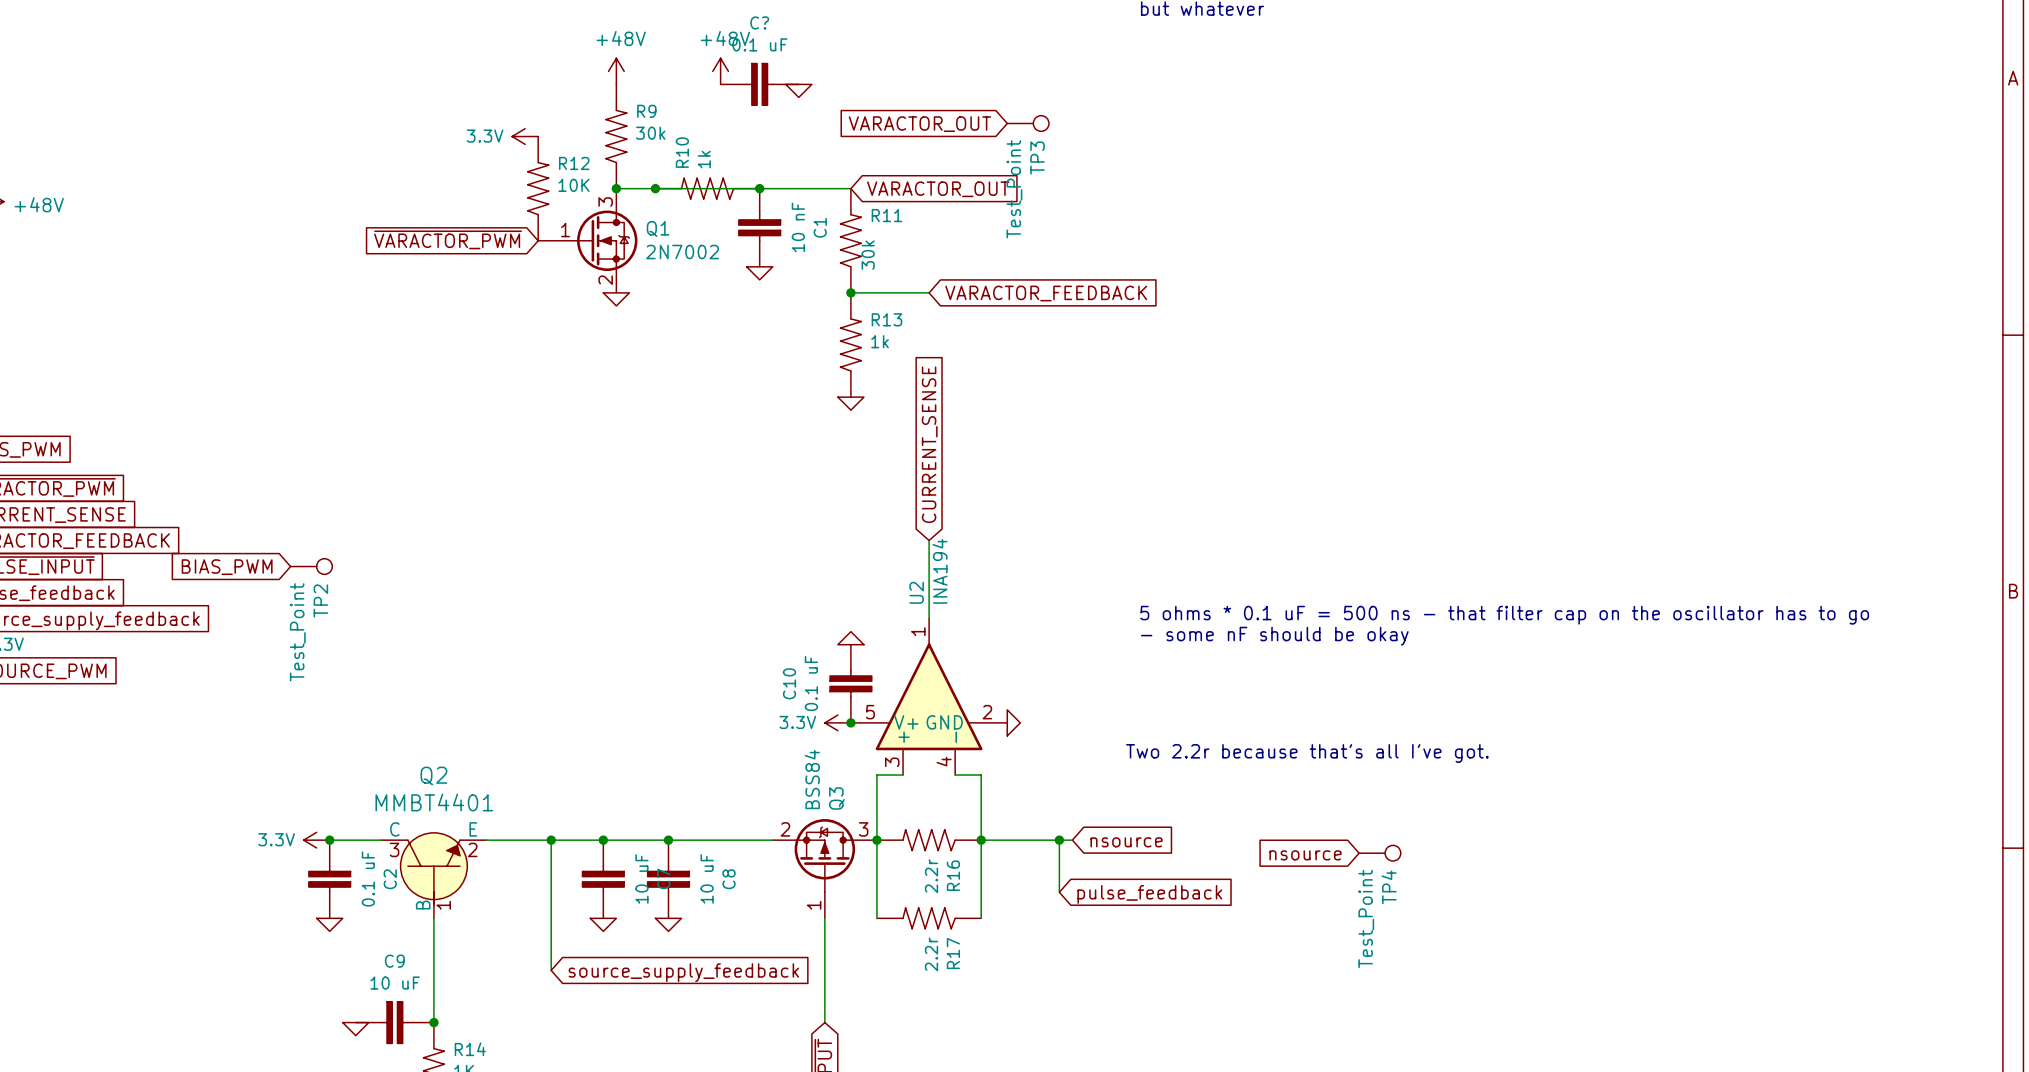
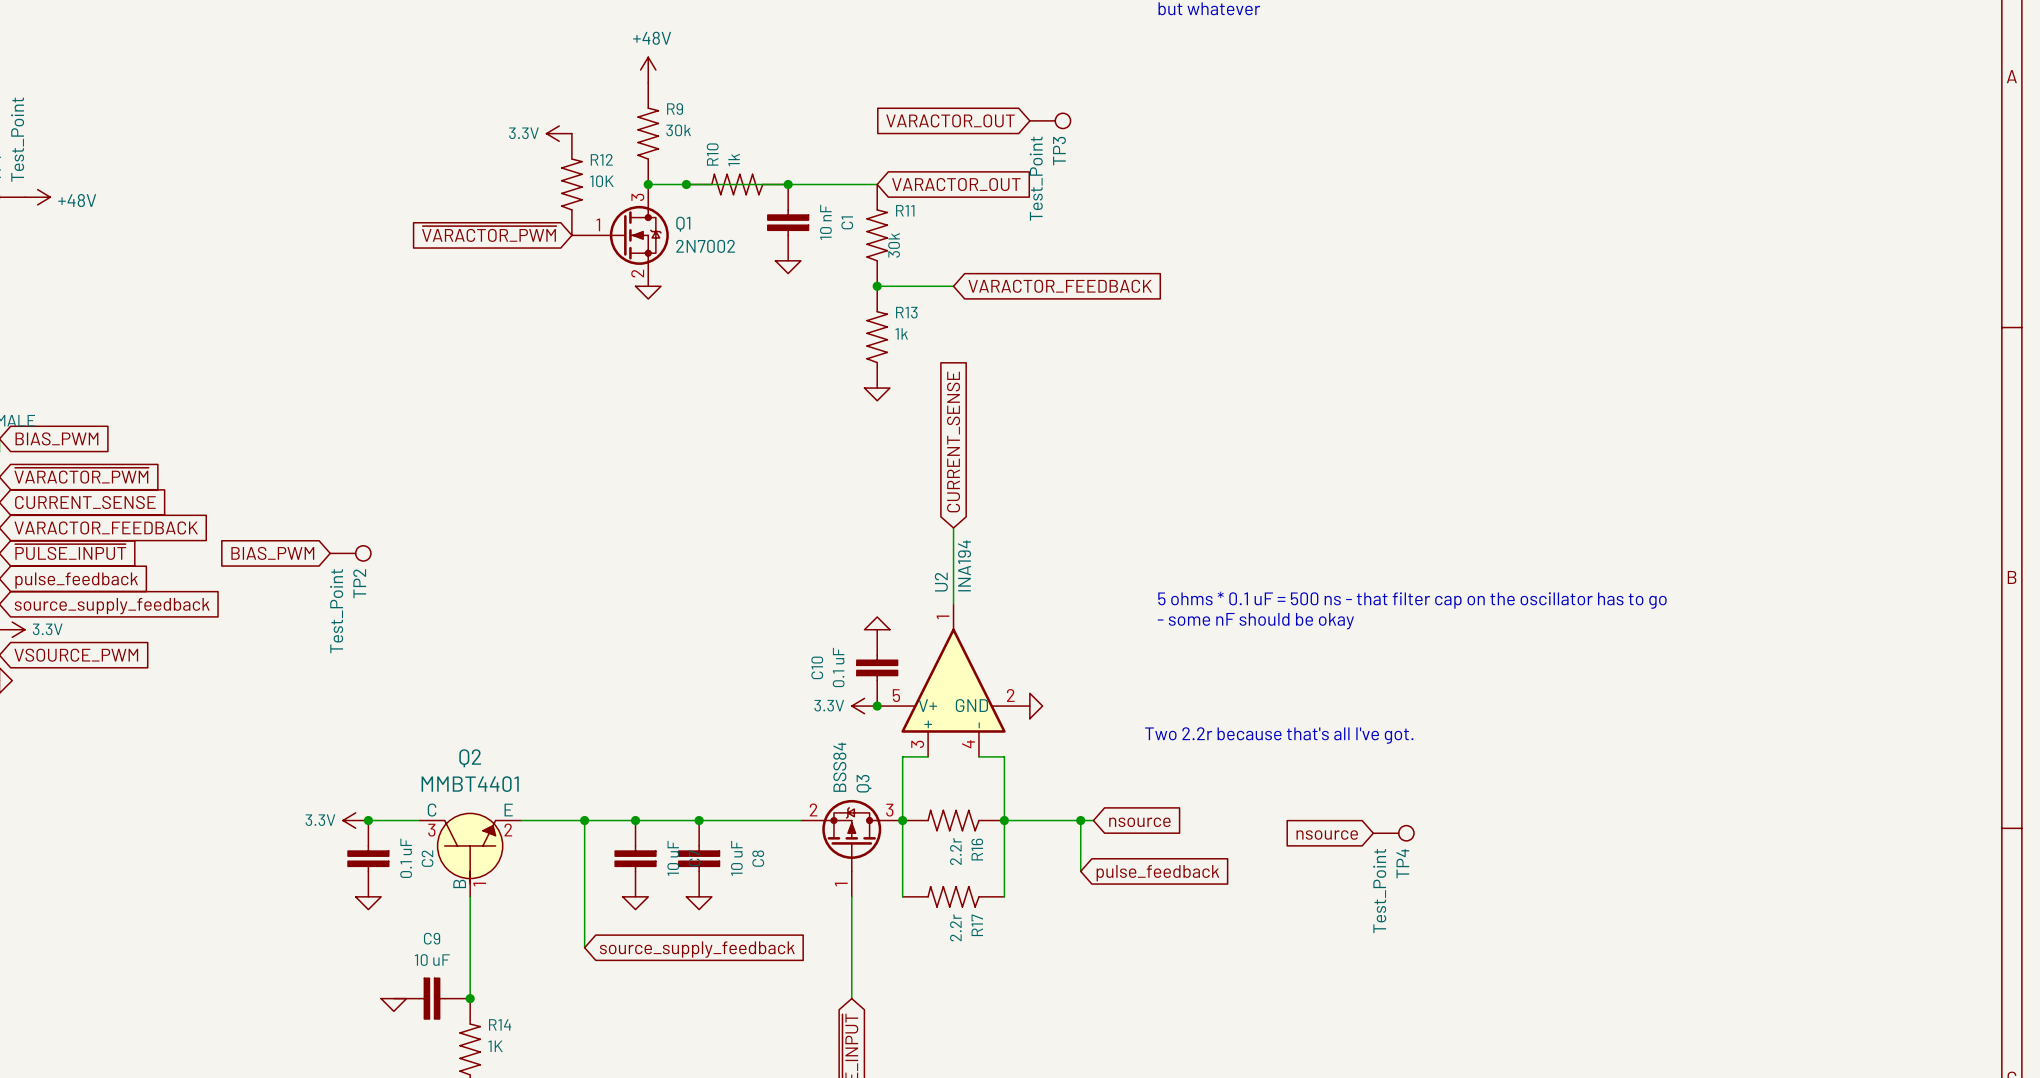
power symbol: +48V (720, 71) -> none
C?: 0.1 uF (759, 84) -> none
power symbol: (798, 90) -> none

